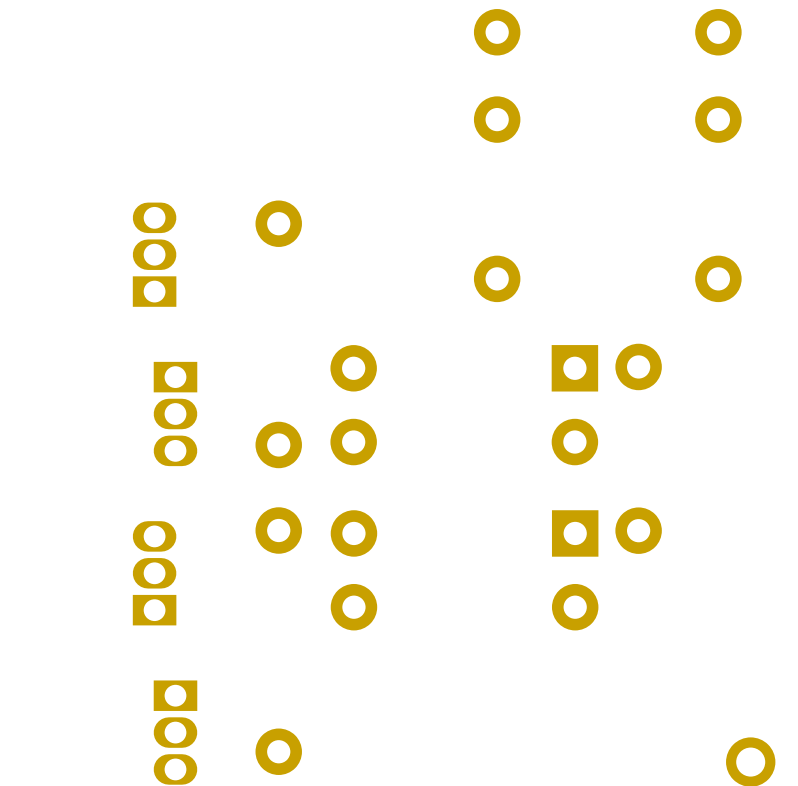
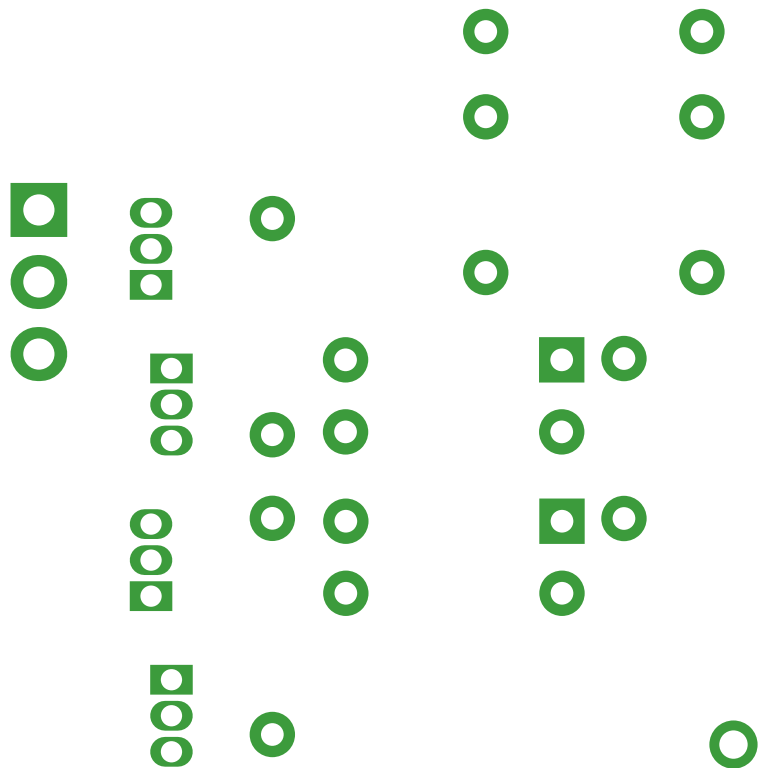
part: none -> (38, 282)

